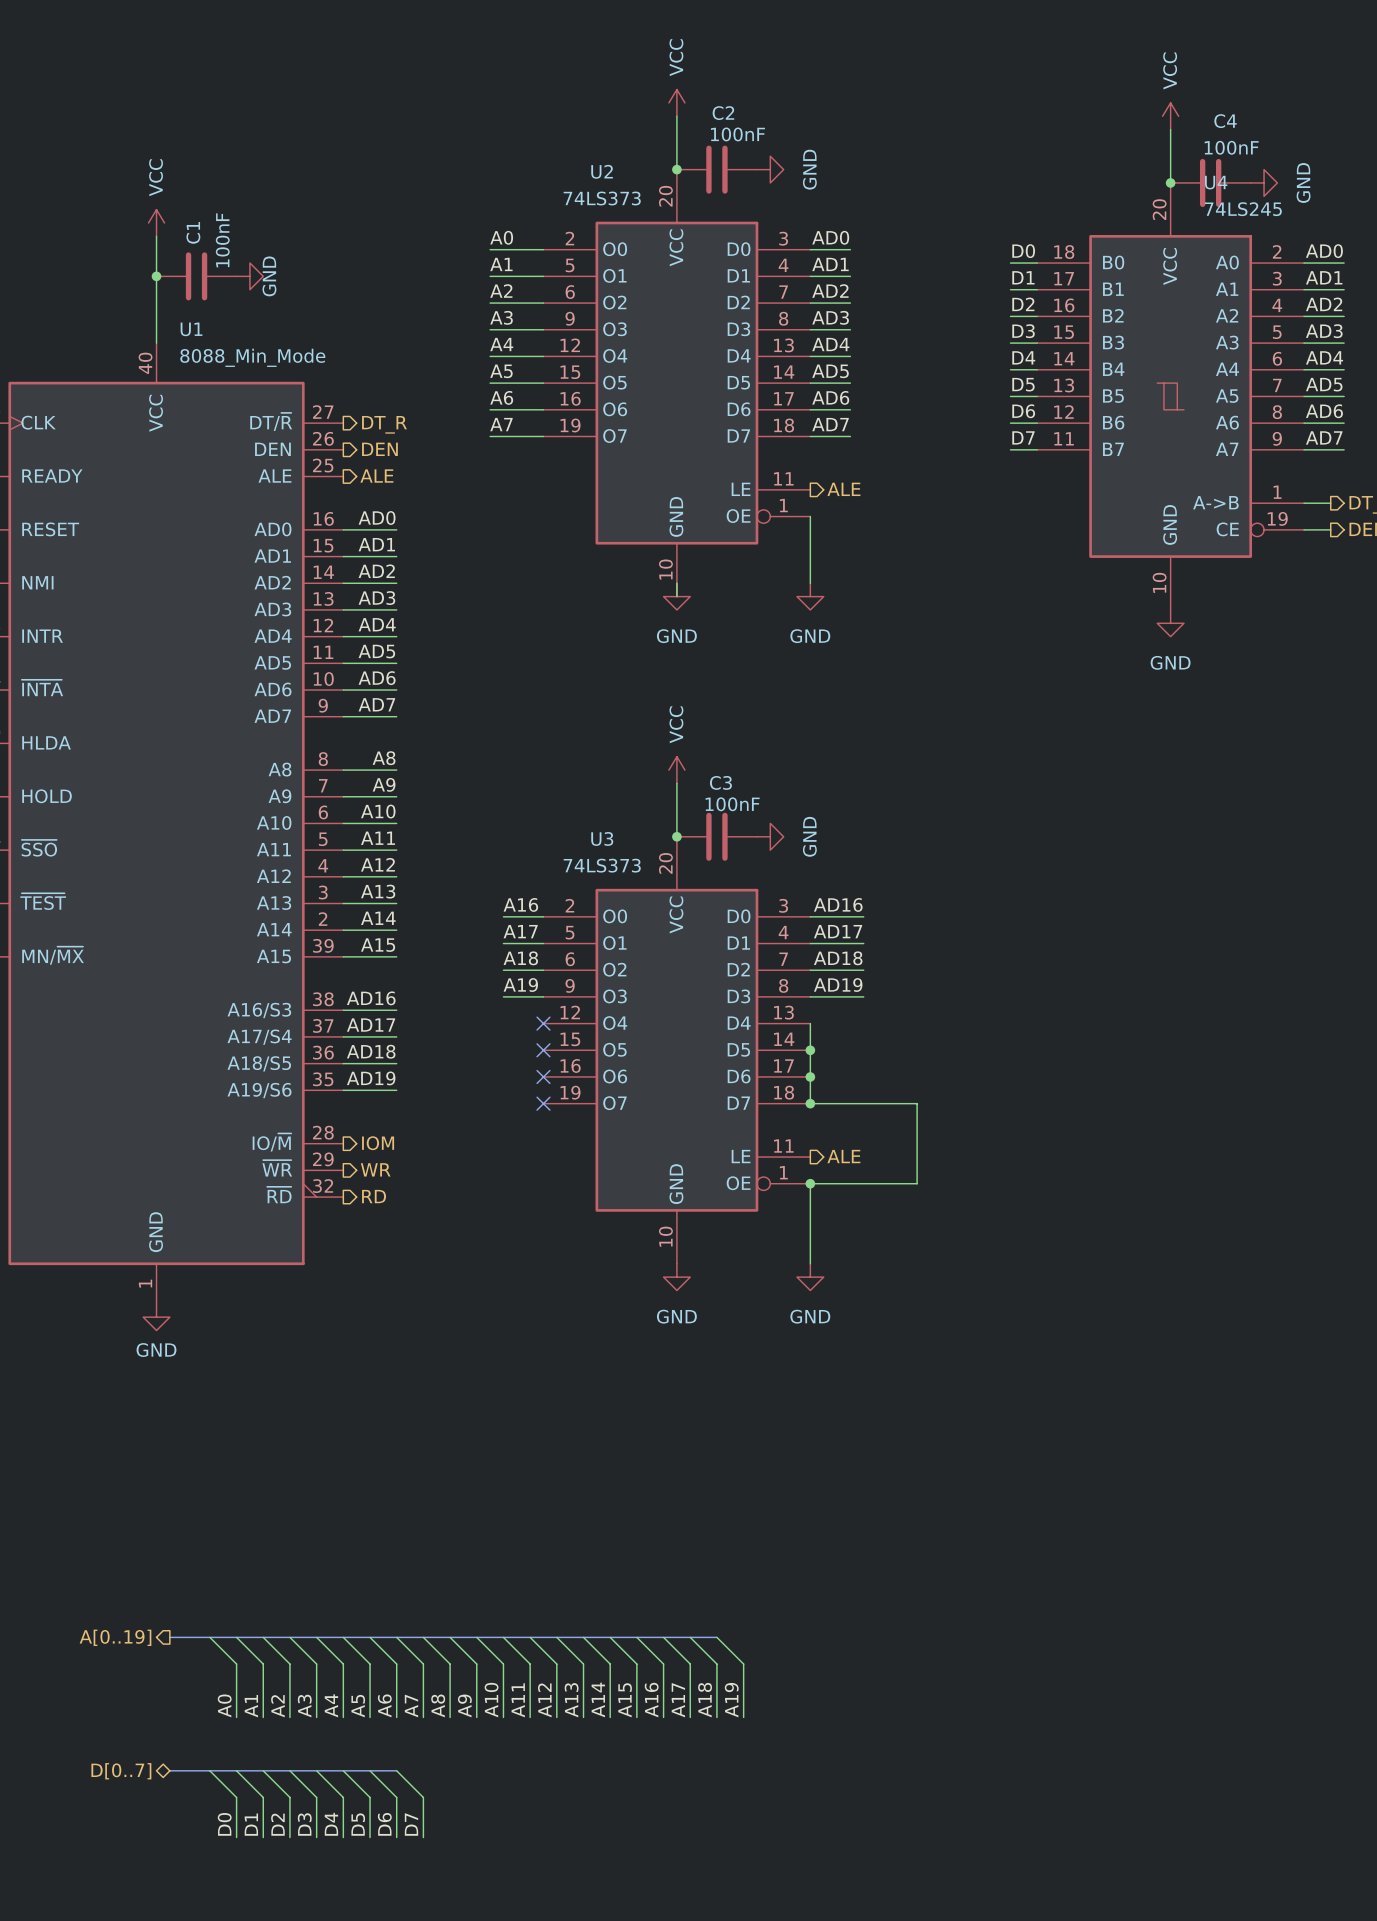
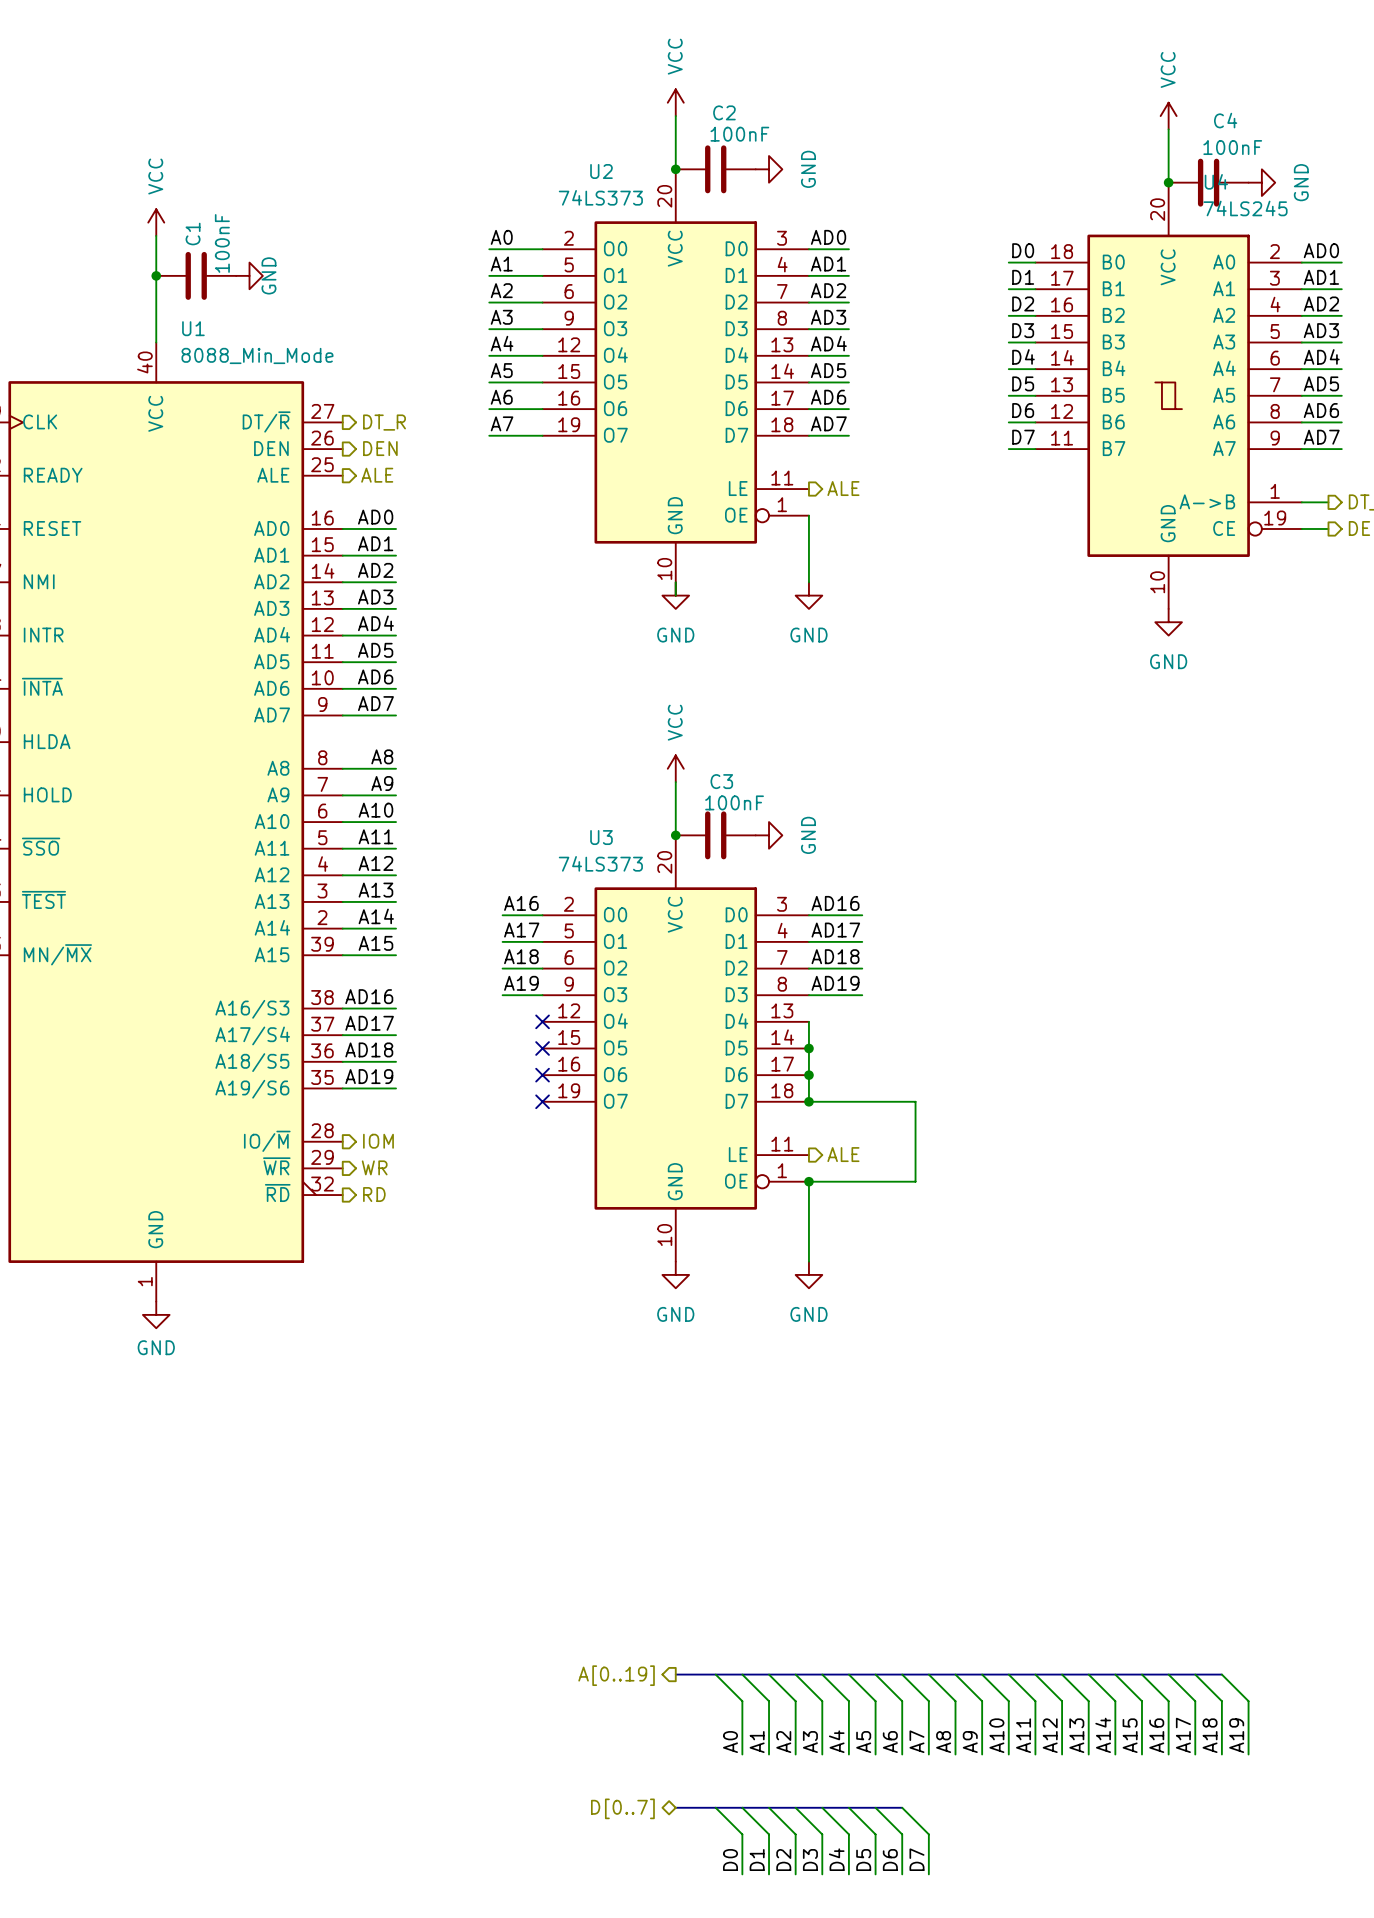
hierarchical label: A[0..19] (115, 1637) -> none
bus: (169, 1637) (716, 1637) -> none
wire: (209, 1637) (236, 1664) (236, 1717) -> none
wire: (236, 1637) (263, 1664) (263, 1717) -> none
wire: (263, 1637) (289, 1664) (289, 1717) -> none
wire: (289, 1637) (316, 1664) (316, 1717) -> none
wire: (316, 1637) (343, 1664) (343, 1717) -> none
wire: (343, 1637) (370, 1664) (370, 1717) -> none
wire: (370, 1637) (396, 1664) (396, 1717) -> none
wire: (396, 1637) (423, 1664) (423, 1717) -> none
wire: (423, 1637) (450, 1664) (450, 1717) -> none
wire: (450, 1637) (476, 1664) (476, 1717) -> none
wire: (476, 1637) (503, 1664) (503, 1717) -> none
wire: (503, 1637) (530, 1664) (530, 1717) -> (742, 1674) (769, 1701) (769, 1754)
wire: (530, 1637) (556, 1664) (556, 1717) -> (769, 1674) (795, 1701) (795, 1754)
wire: (556, 1637) (583, 1664) (583, 1717) -> (795, 1674) (822, 1701) (822, 1754)
wire: (583, 1637) (610, 1664) (610, 1717) -> (822, 1674) (848, 1701) (848, 1754)
wire: (610, 1637) (636, 1664) (636, 1717) -> (848, 1674) (875, 1701) (875, 1754)
wire: (636, 1637) (663, 1664) (663, 1717) -> (875, 1674) (902, 1701) (902, 1754)
wire: (663, 1637) (690, 1664) (690, 1717) -> (902, 1674) (928, 1701) (928, 1754)
wire: (690, 1637) (716, 1664) (716, 1717) -> (928, 1674) (955, 1701) (955, 1754)
wire: (716, 1637) (743, 1664) (743, 1704) -> (715, 1674) (742, 1701)
hierarchical label: none -> A[0..19] (616, 1675)
bus: none -> (675, 1674) (1221, 1674)
wire: none -> (955, 1674) (982, 1701) (982, 1754)
wire: none -> (982, 1674) (1008, 1701) (1008, 1754)
wire: none -> (1008, 1674) (1035, 1701) (1035, 1754)
wire: none -> (1035, 1674) (1062, 1701) (1062, 1754)
wire: none -> (1062, 1674) (1088, 1701) (1088, 1754)
wire: none -> (1088, 1674) (1115, 1701) (1115, 1754)
wire: none -> (1115, 1674) (1141, 1701) (1141, 1754)
wire: none -> (1141, 1674) (1168, 1701) (1168, 1754)
wire: none -> (1168, 1674) (1195, 1701) (1195, 1754)
wire: none -> (1195, 1674) (1221, 1701) (1221, 1754)
wire: none -> (1221, 1674) (1248, 1701) (1248, 1754)
label: A14 (598, 1699) -> none
label: A10 (491, 1700) -> none
label: A11 (518, 1700) -> none
label: A12 (544, 1700) -> none
label: A13 (571, 1700) -> none
label: A15 (625, 1700) -> none
label: A16 (651, 1700) -> none
label: A17 (678, 1700) -> none
label: A18 (705, 1700) -> none
label: A19 (731, 1700) -> none
label: A0 (224, 1705) -> none
label: A4 (331, 1705) -> none
label: A6 (384, 1705) -> none
label: A8 (438, 1705) -> none
label: A9 (464, 1705) -> none
label: A1 (251, 1706) -> none
label: A2 (277, 1706) -> none
label: A3 (304, 1706) -> none
label: A5 (358, 1706) -> none
label: A7 (411, 1706) -> none
wire: none -> (742, 1714) (742, 1754)
label: none -> A10 (996, 1735)
label: none -> A11 (1023, 1735)
label: none -> A12 (1050, 1735)
label: none -> A13 (1076, 1735)
label: none -> A14 (1103, 1735)
label: none -> A15 (1130, 1735)
label: none -> A16 (1156, 1735)
label: none -> A17 (1183, 1735)
label: none -> A18 (1210, 1735)
label: none -> A19 (1236, 1735)
label: none -> A0 (730, 1742)
label: none -> A4 (836, 1741)
label: none -> A6 (890, 1742)
label: none -> A8 (943, 1742)
label: none -> A9 (970, 1742)
label: none -> A1 (757, 1742)
label: none -> A2 (783, 1742)
label: none -> A3 (810, 1742)
label: none -> A5 (863, 1742)
label: none -> A7 (916, 1741)
bus: (169, 1770) (396, 1770) -> none
wire: (209, 1770) (236, 1797) (236, 1837) -> none
wire: (236, 1770) (263, 1797) (263, 1837) -> none
wire: (263, 1770) (289, 1797) (289, 1837) -> none
wire: (289, 1770) (316, 1797) (316, 1837) -> none
wire: (316, 1770) (343, 1797) (343, 1837) -> none
wire: (343, 1770) (370, 1797) (370, 1837) -> none
wire: (370, 1770) (396, 1797) (396, 1837) -> none
wire: (396, 1770) (423, 1797) (423, 1837) -> none
hierarchical label: D[0..7] (121, 1771) -> none
bus: none -> (675, 1807) (902, 1807)
wire: none -> (715, 1807) (742, 1834) (742, 1874)
wire: none -> (742, 1807) (769, 1834) (769, 1874)
wire: none -> (769, 1807) (795, 1834) (795, 1874)
wire: none -> (795, 1807) (822, 1834) (822, 1874)
wire: none -> (822, 1807) (848, 1834) (848, 1874)
wire: none -> (848, 1807) (875, 1834) (875, 1874)
wire: none -> (875, 1807) (902, 1834) (902, 1874)
wire: none -> (902, 1807) (928, 1834) (928, 1874)
hierarchical label: none -> D[0..7] (622, 1808)
label: D0 (224, 1824) -> none
label: D1 (251, 1824) -> none
label: D2 (277, 1824) -> none
label: D3 (304, 1824) -> none
label: D4 (331, 1824) -> none
label: D5 (358, 1824) -> none
label: D6 (384, 1824) -> none
label: D7 (411, 1824) -> none
label: none -> D0 (730, 1860)
label: none -> D1 (757, 1860)
label: none -> D2 (783, 1860)
label: none -> D3 (810, 1860)
label: none -> D4 (836, 1859)
label: none -> D5 (863, 1860)
label: none -> D6 (890, 1860)
label: none -> D7 (916, 1859)

